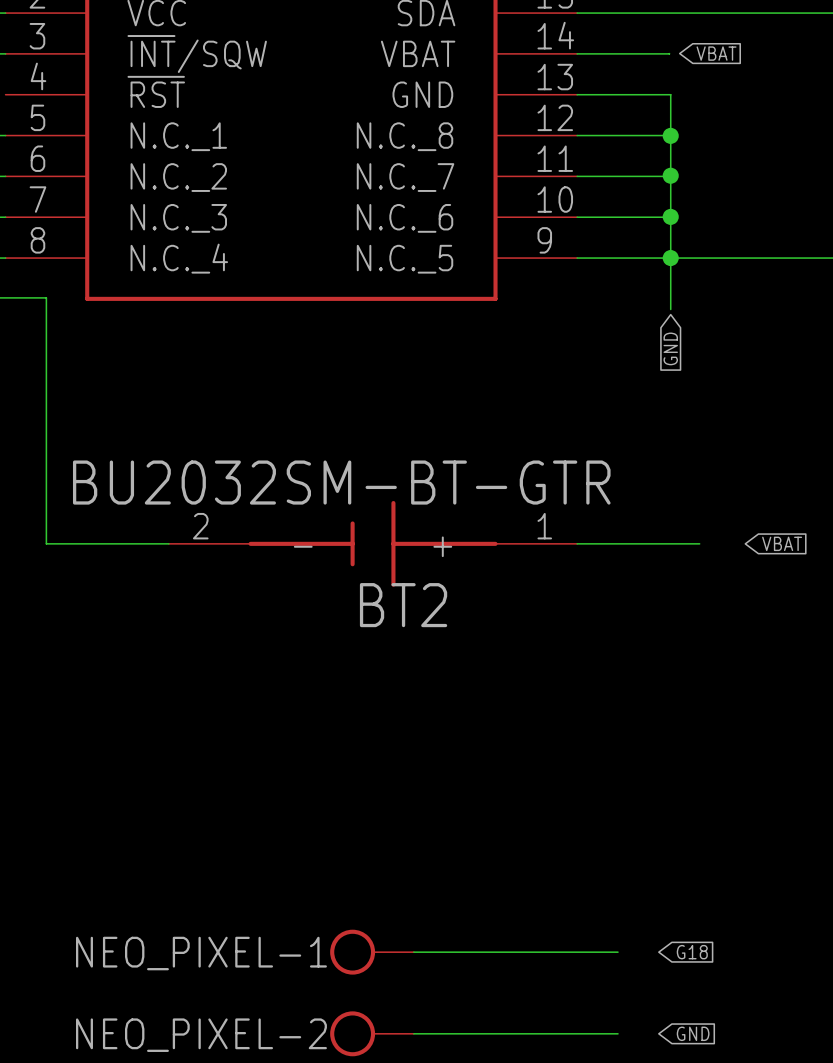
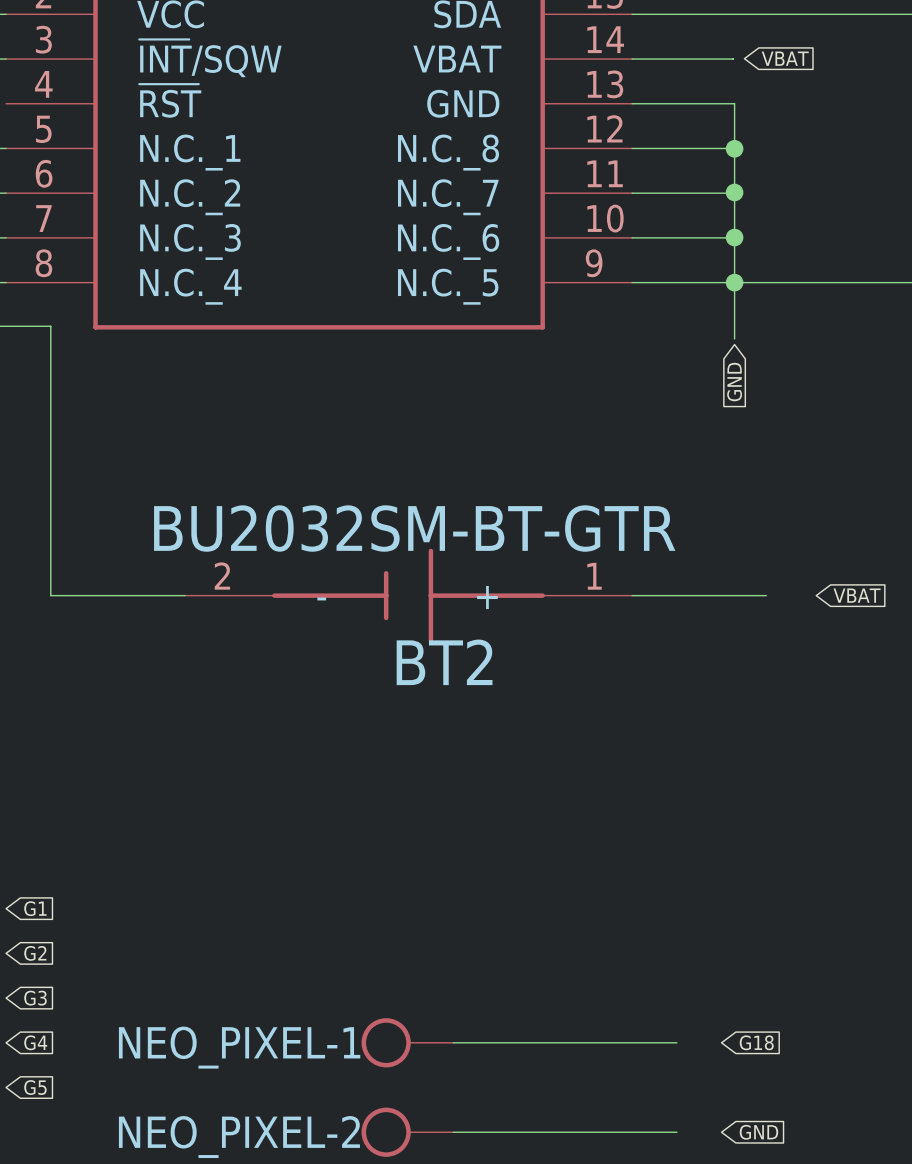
global label: none -> G1 (35, 908)
global label: none -> G2 (35, 953)
global label: none -> G3 (35, 998)
global label: none -> G4 (35, 1042)
global label: none -> G5 (35, 1087)

